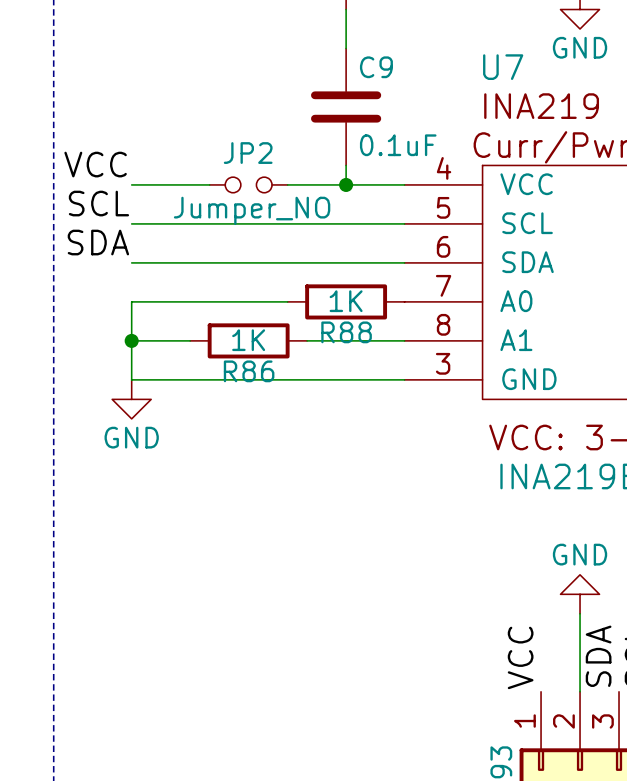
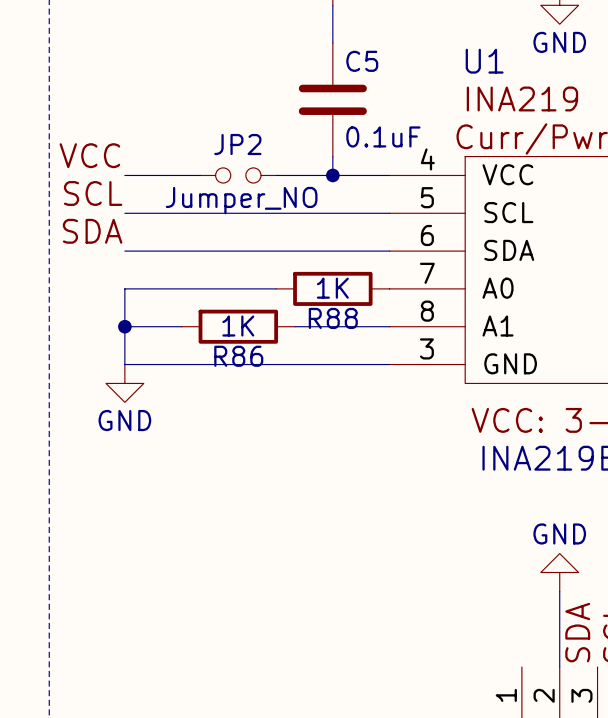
C9 name: C9 (376, 67) -> C5 (362, 61)
U7 name: U7 (503, 67) -> U1 (484, 61)
label: VCC (520, 657) -> none

